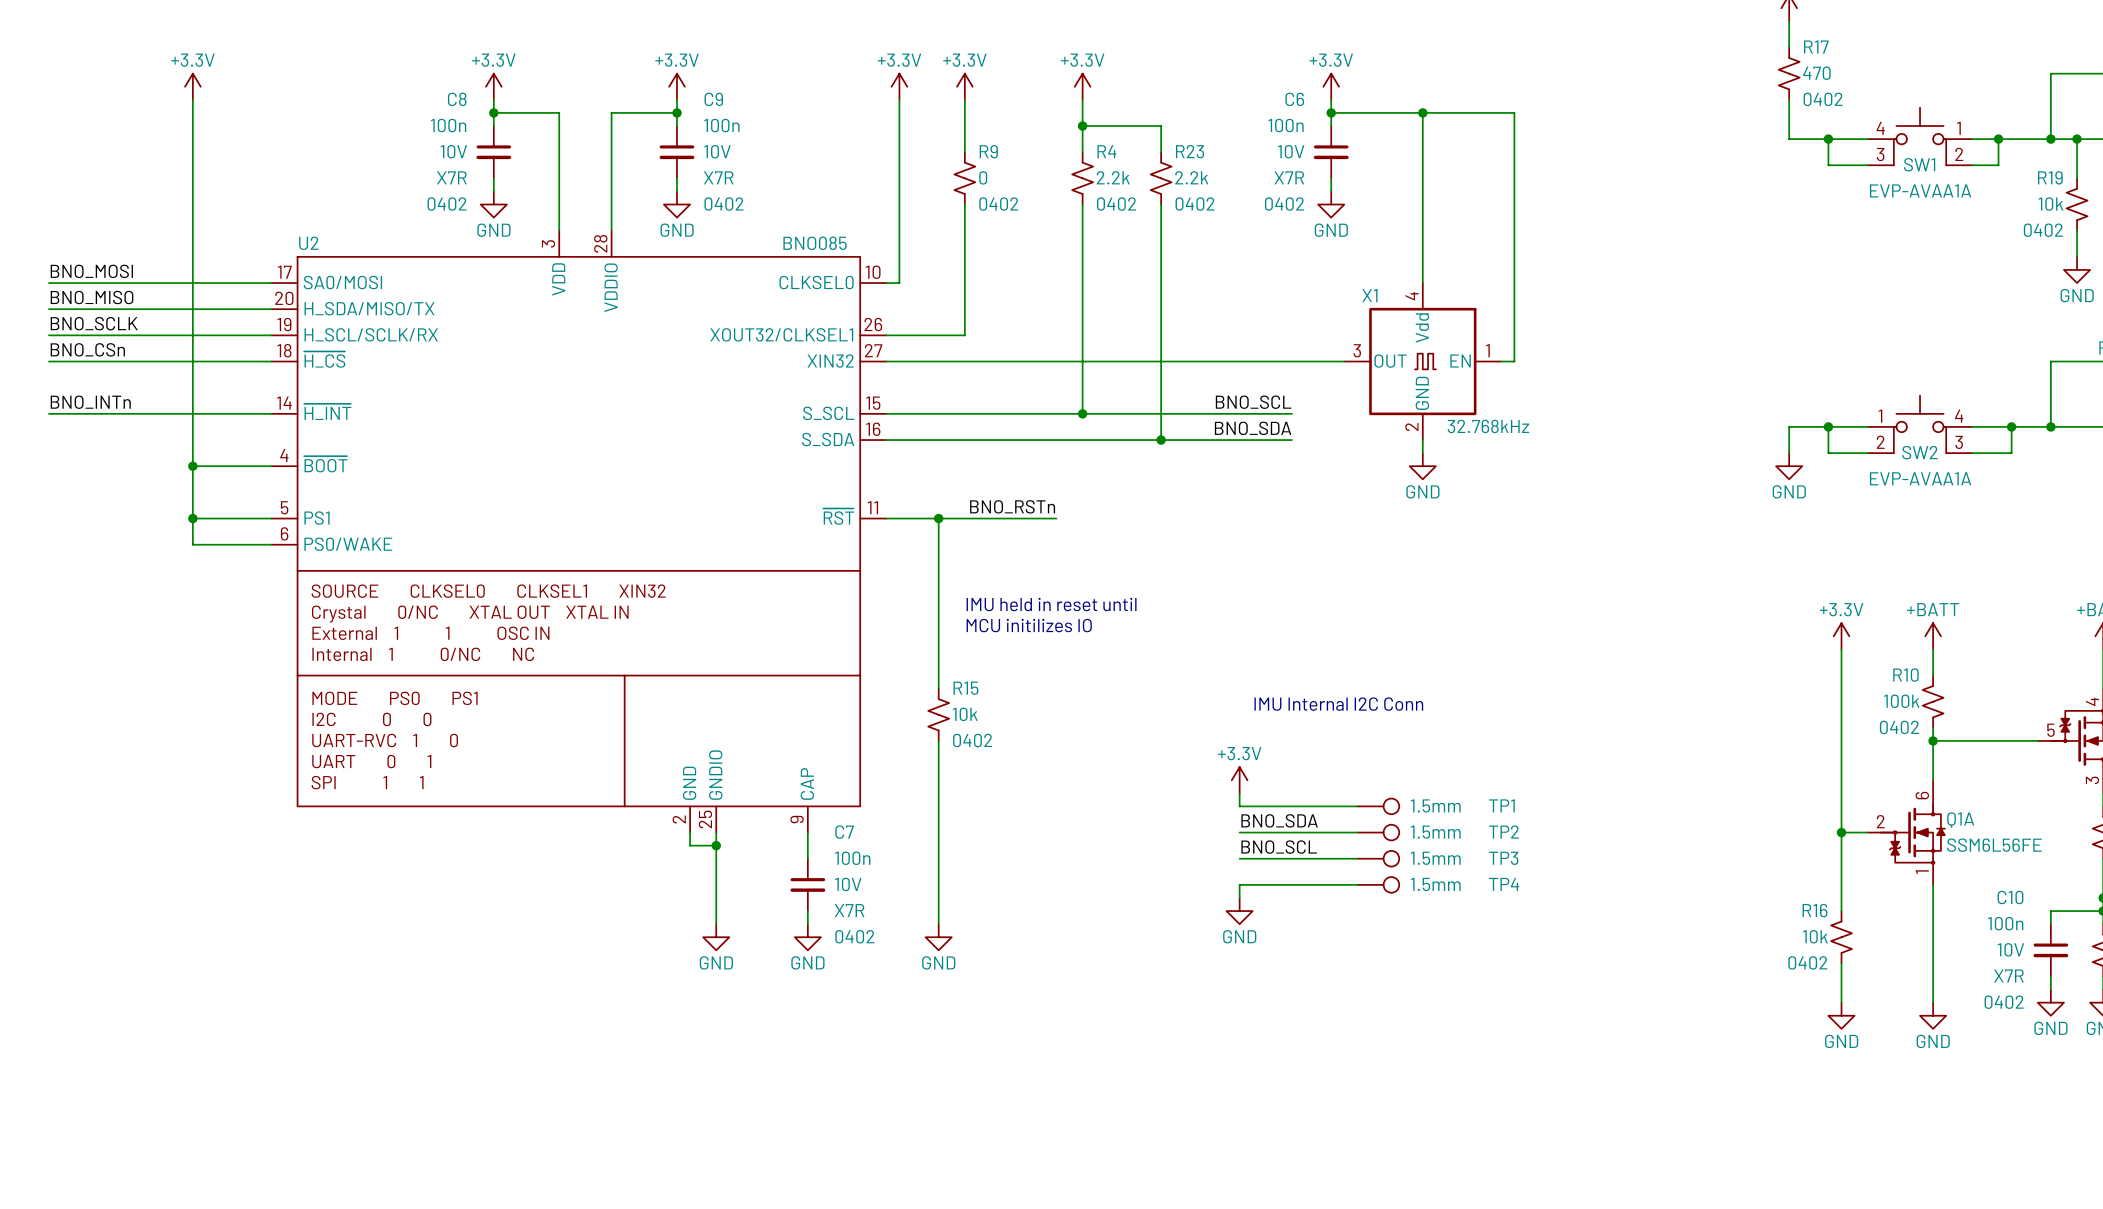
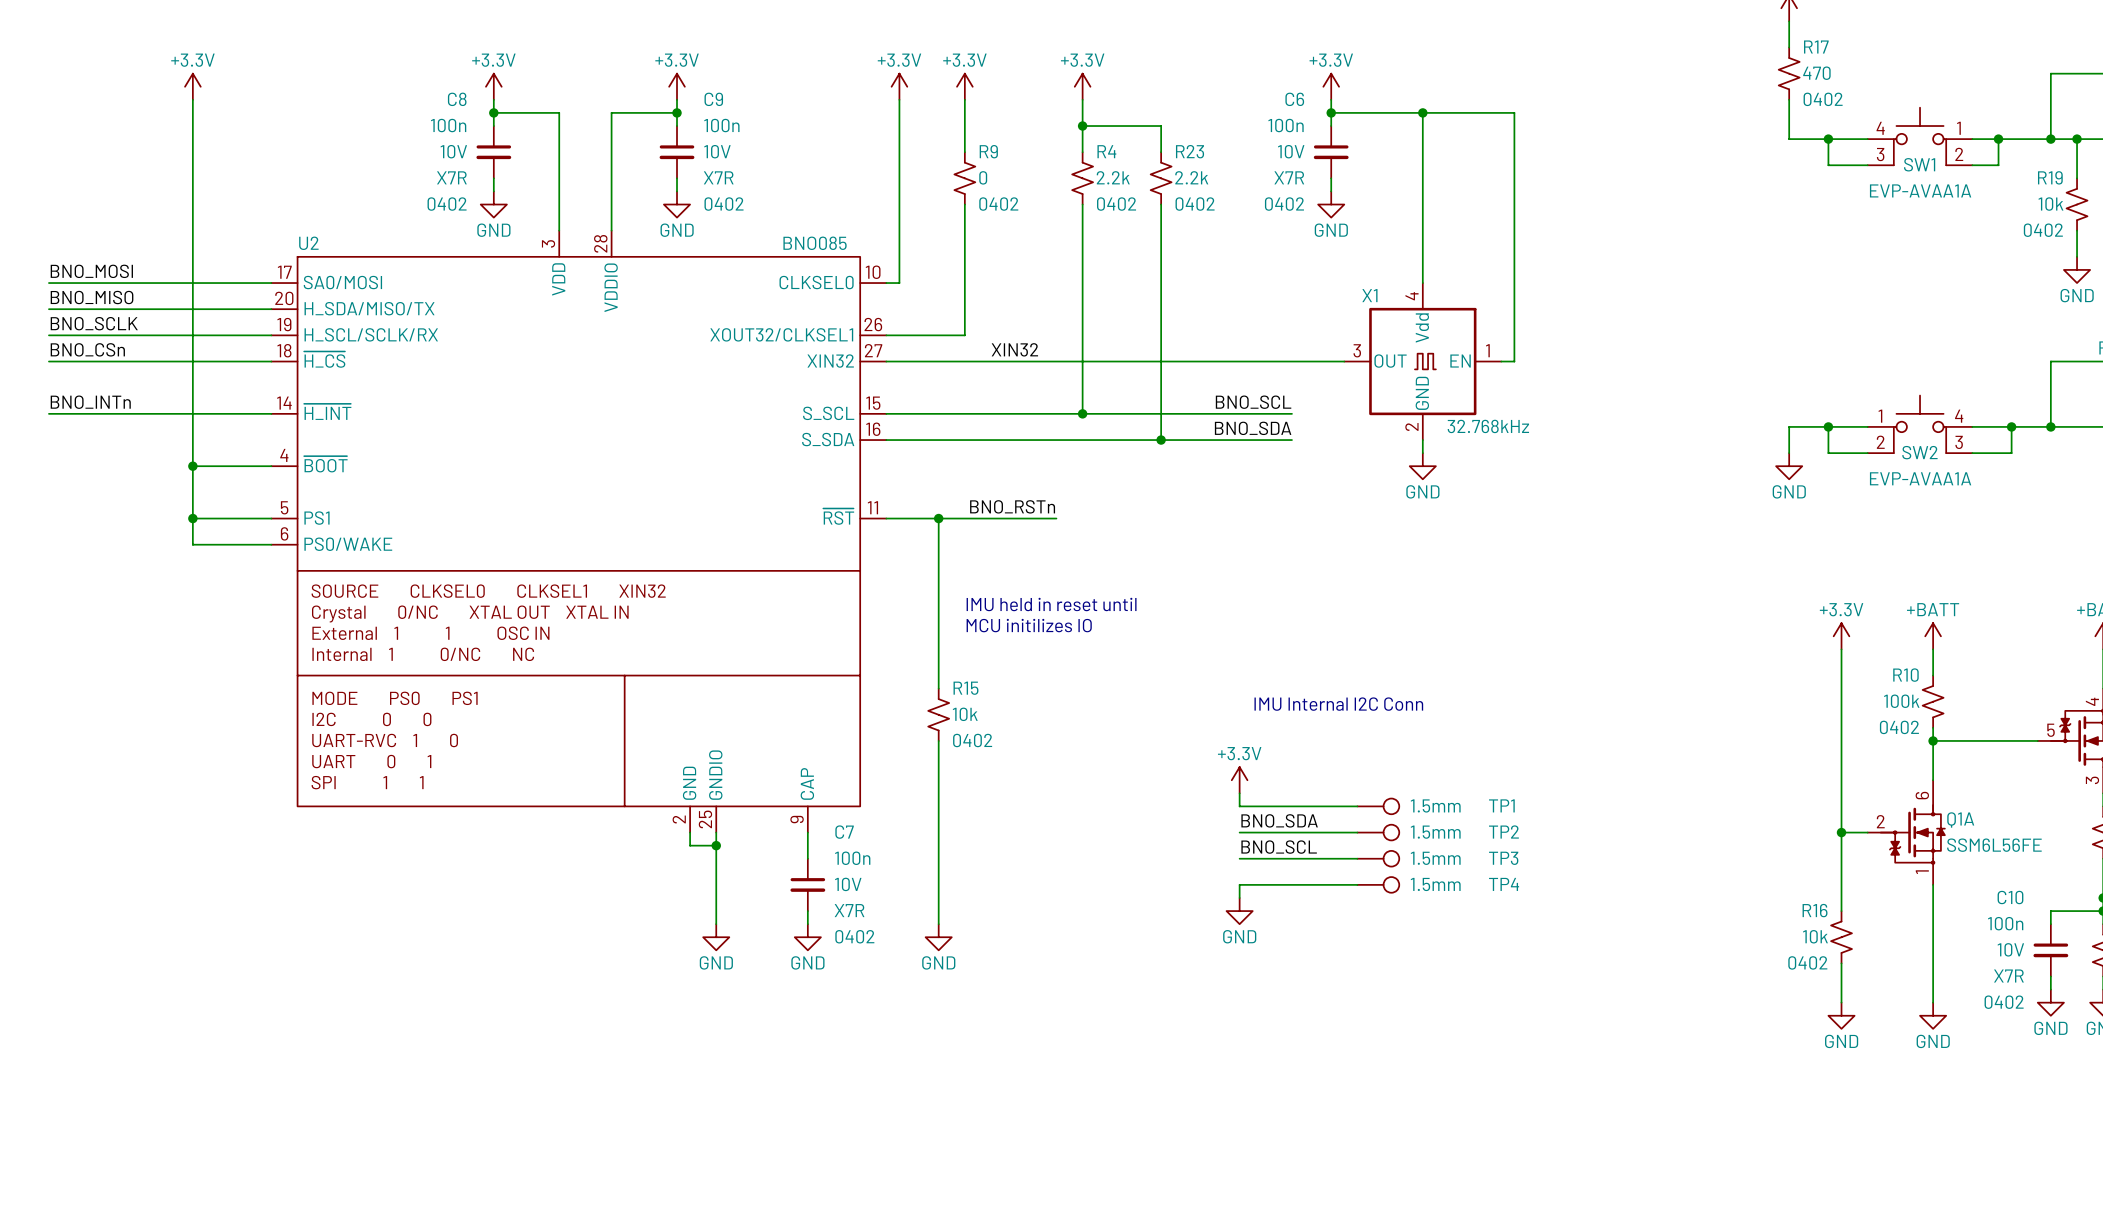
label: none -> XIN32 (1014, 349)

